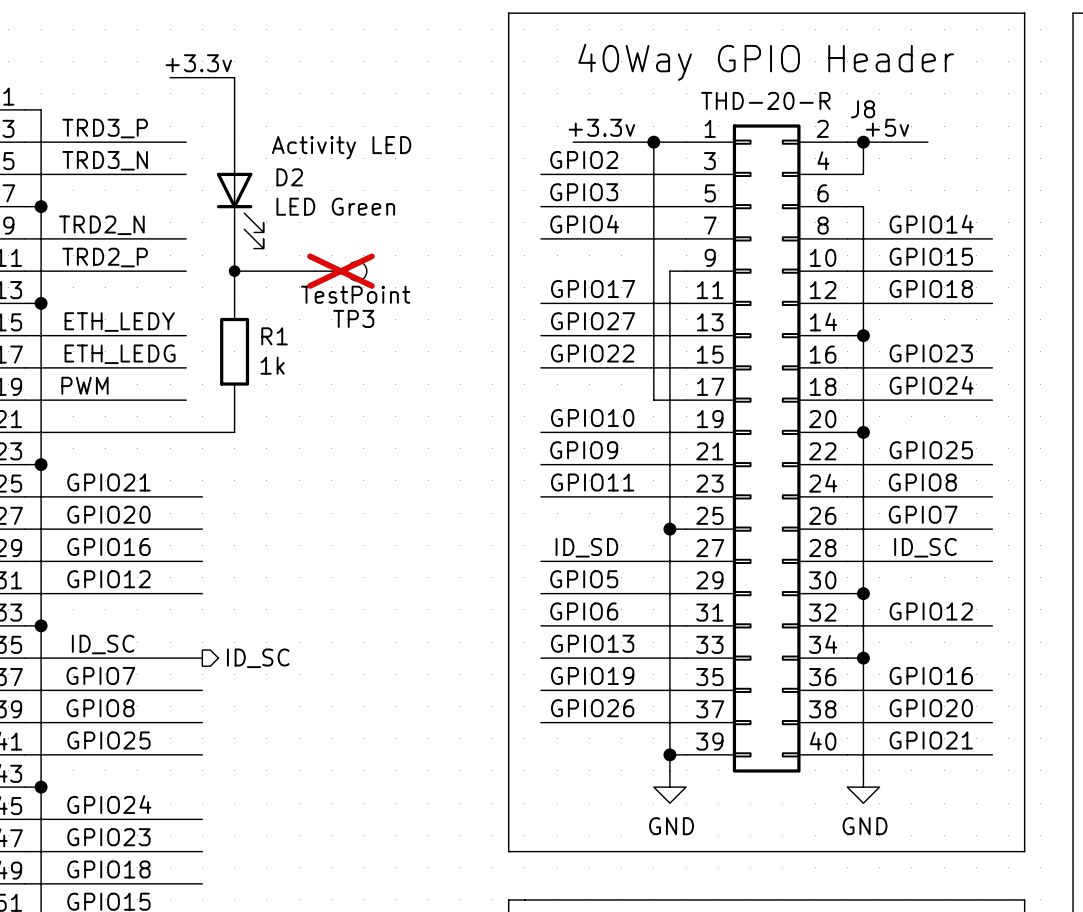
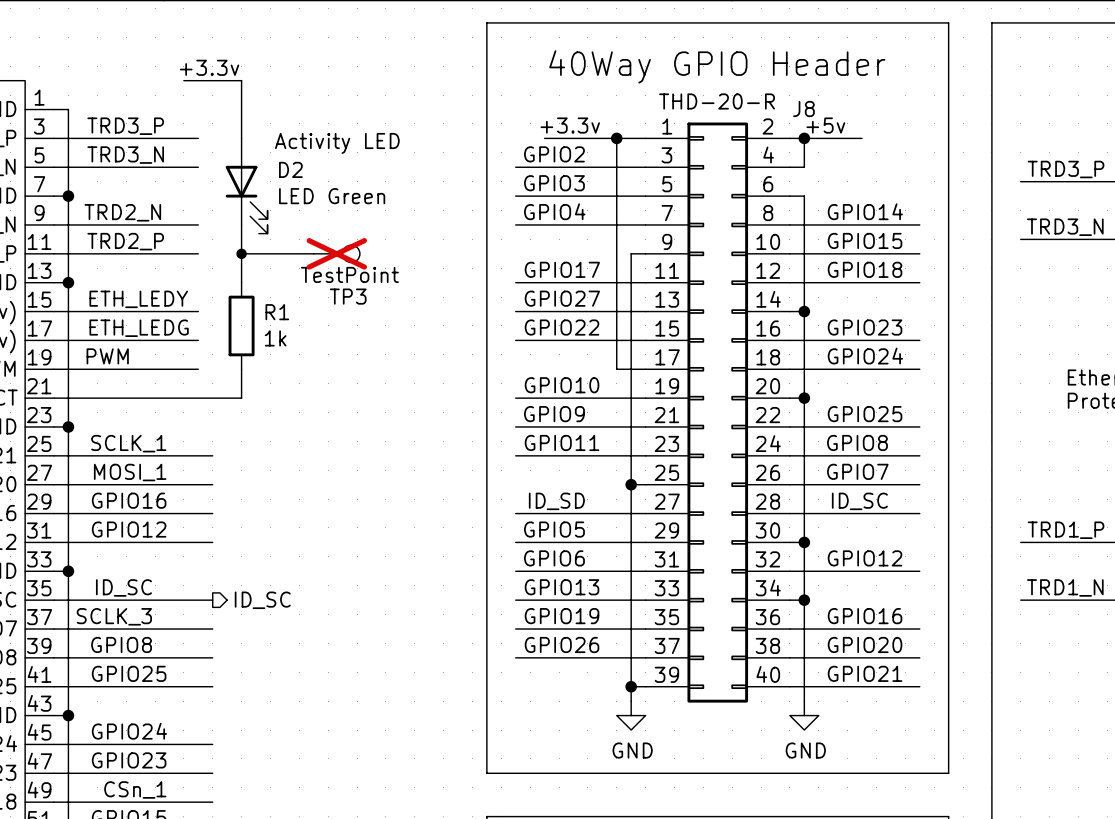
label: GPIO21 (108, 482) -> SCLK_1 (128, 443)
label: GPIO20 (108, 514) -> MOSI_1 (130, 472)
label: GPIO7 (100, 675) -> SCLK_3 (114, 616)
label: GPIO18 (108, 869) -> CSn_1 (135, 789)

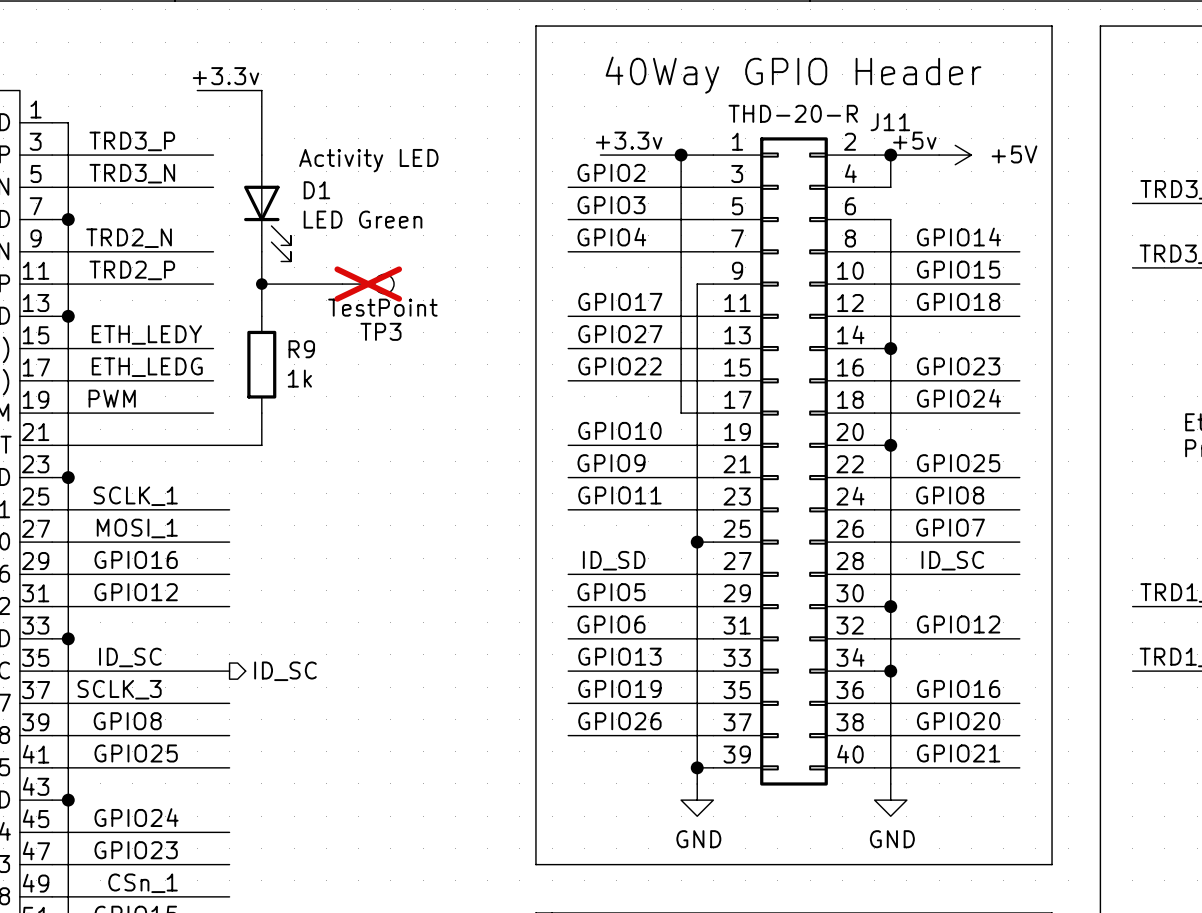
J8 name: J8 (803, 108) -> J11 (890, 122)
power symbol: none -> +5V (955, 155)
D2 name: D2 (290, 169) -> D1 (316, 190)
R1 name: R1 (277, 312) -> R9 (301, 349)

